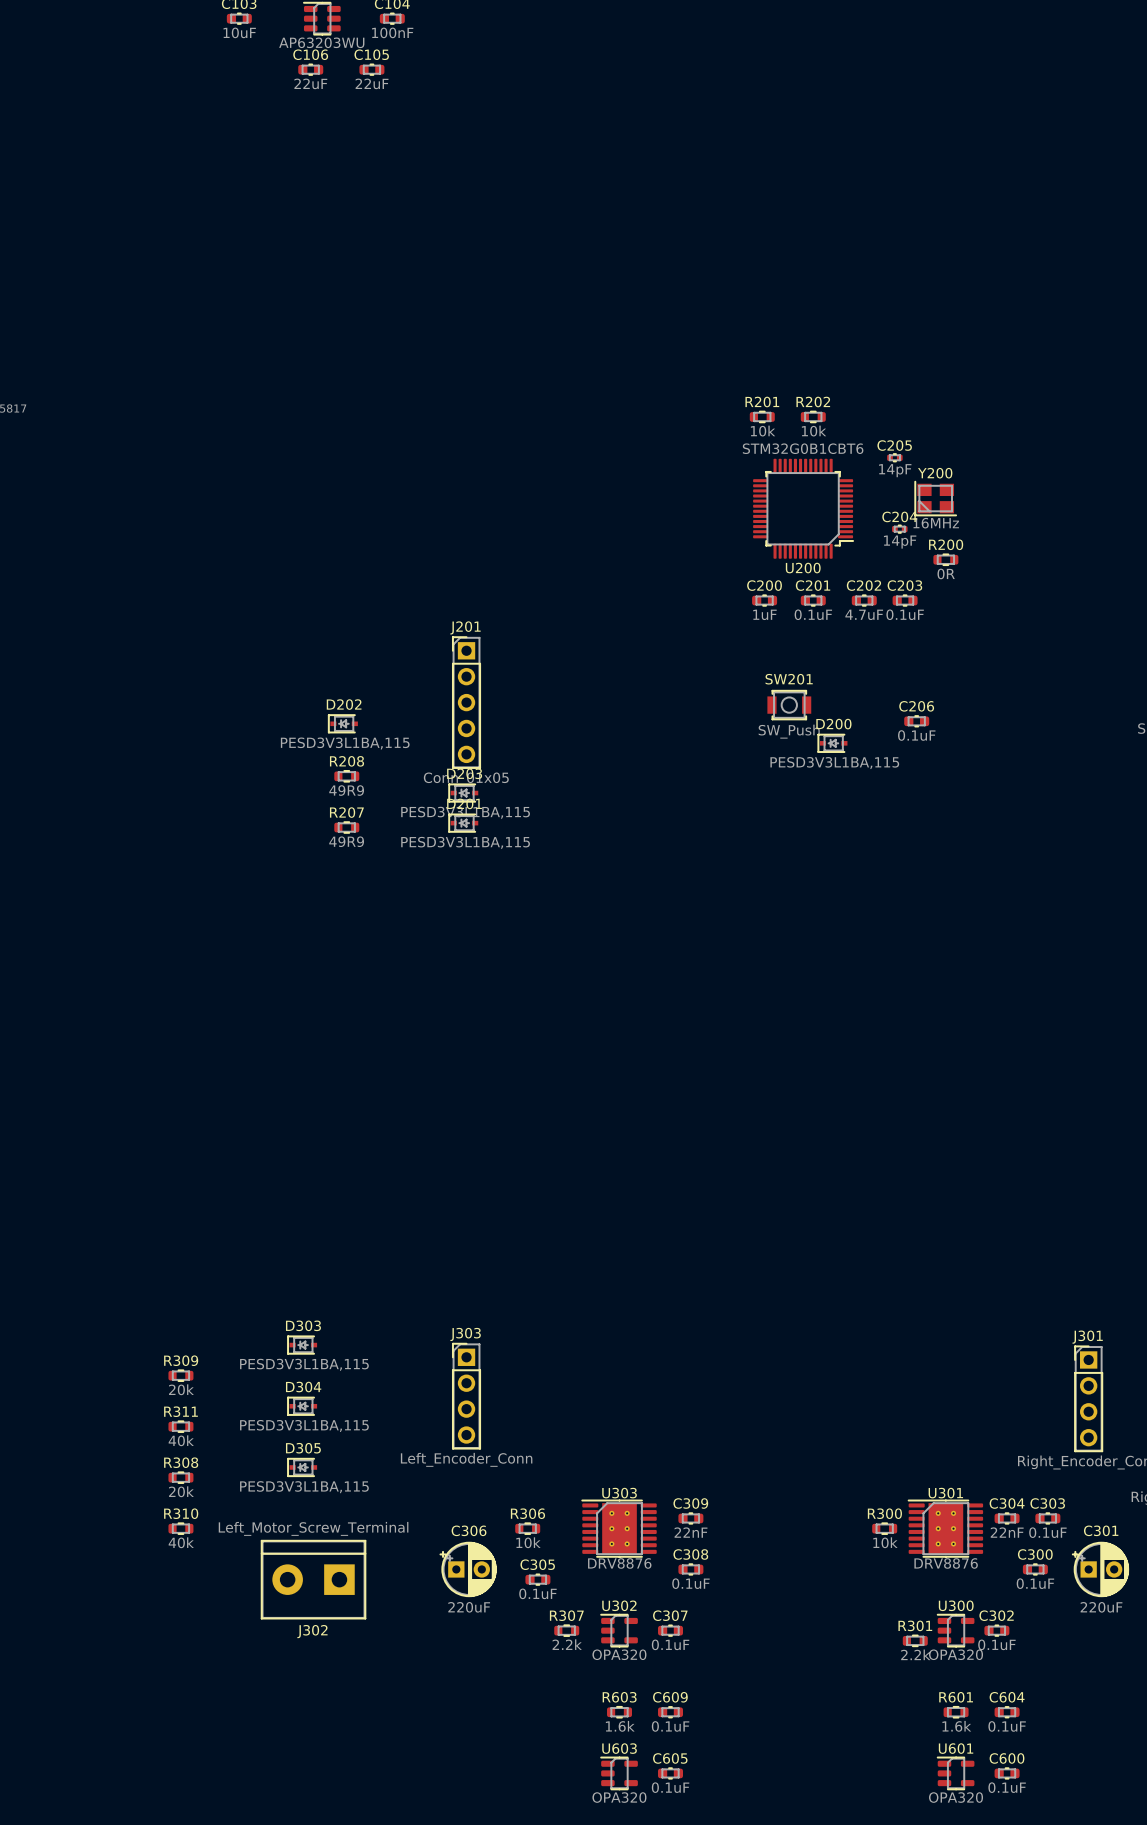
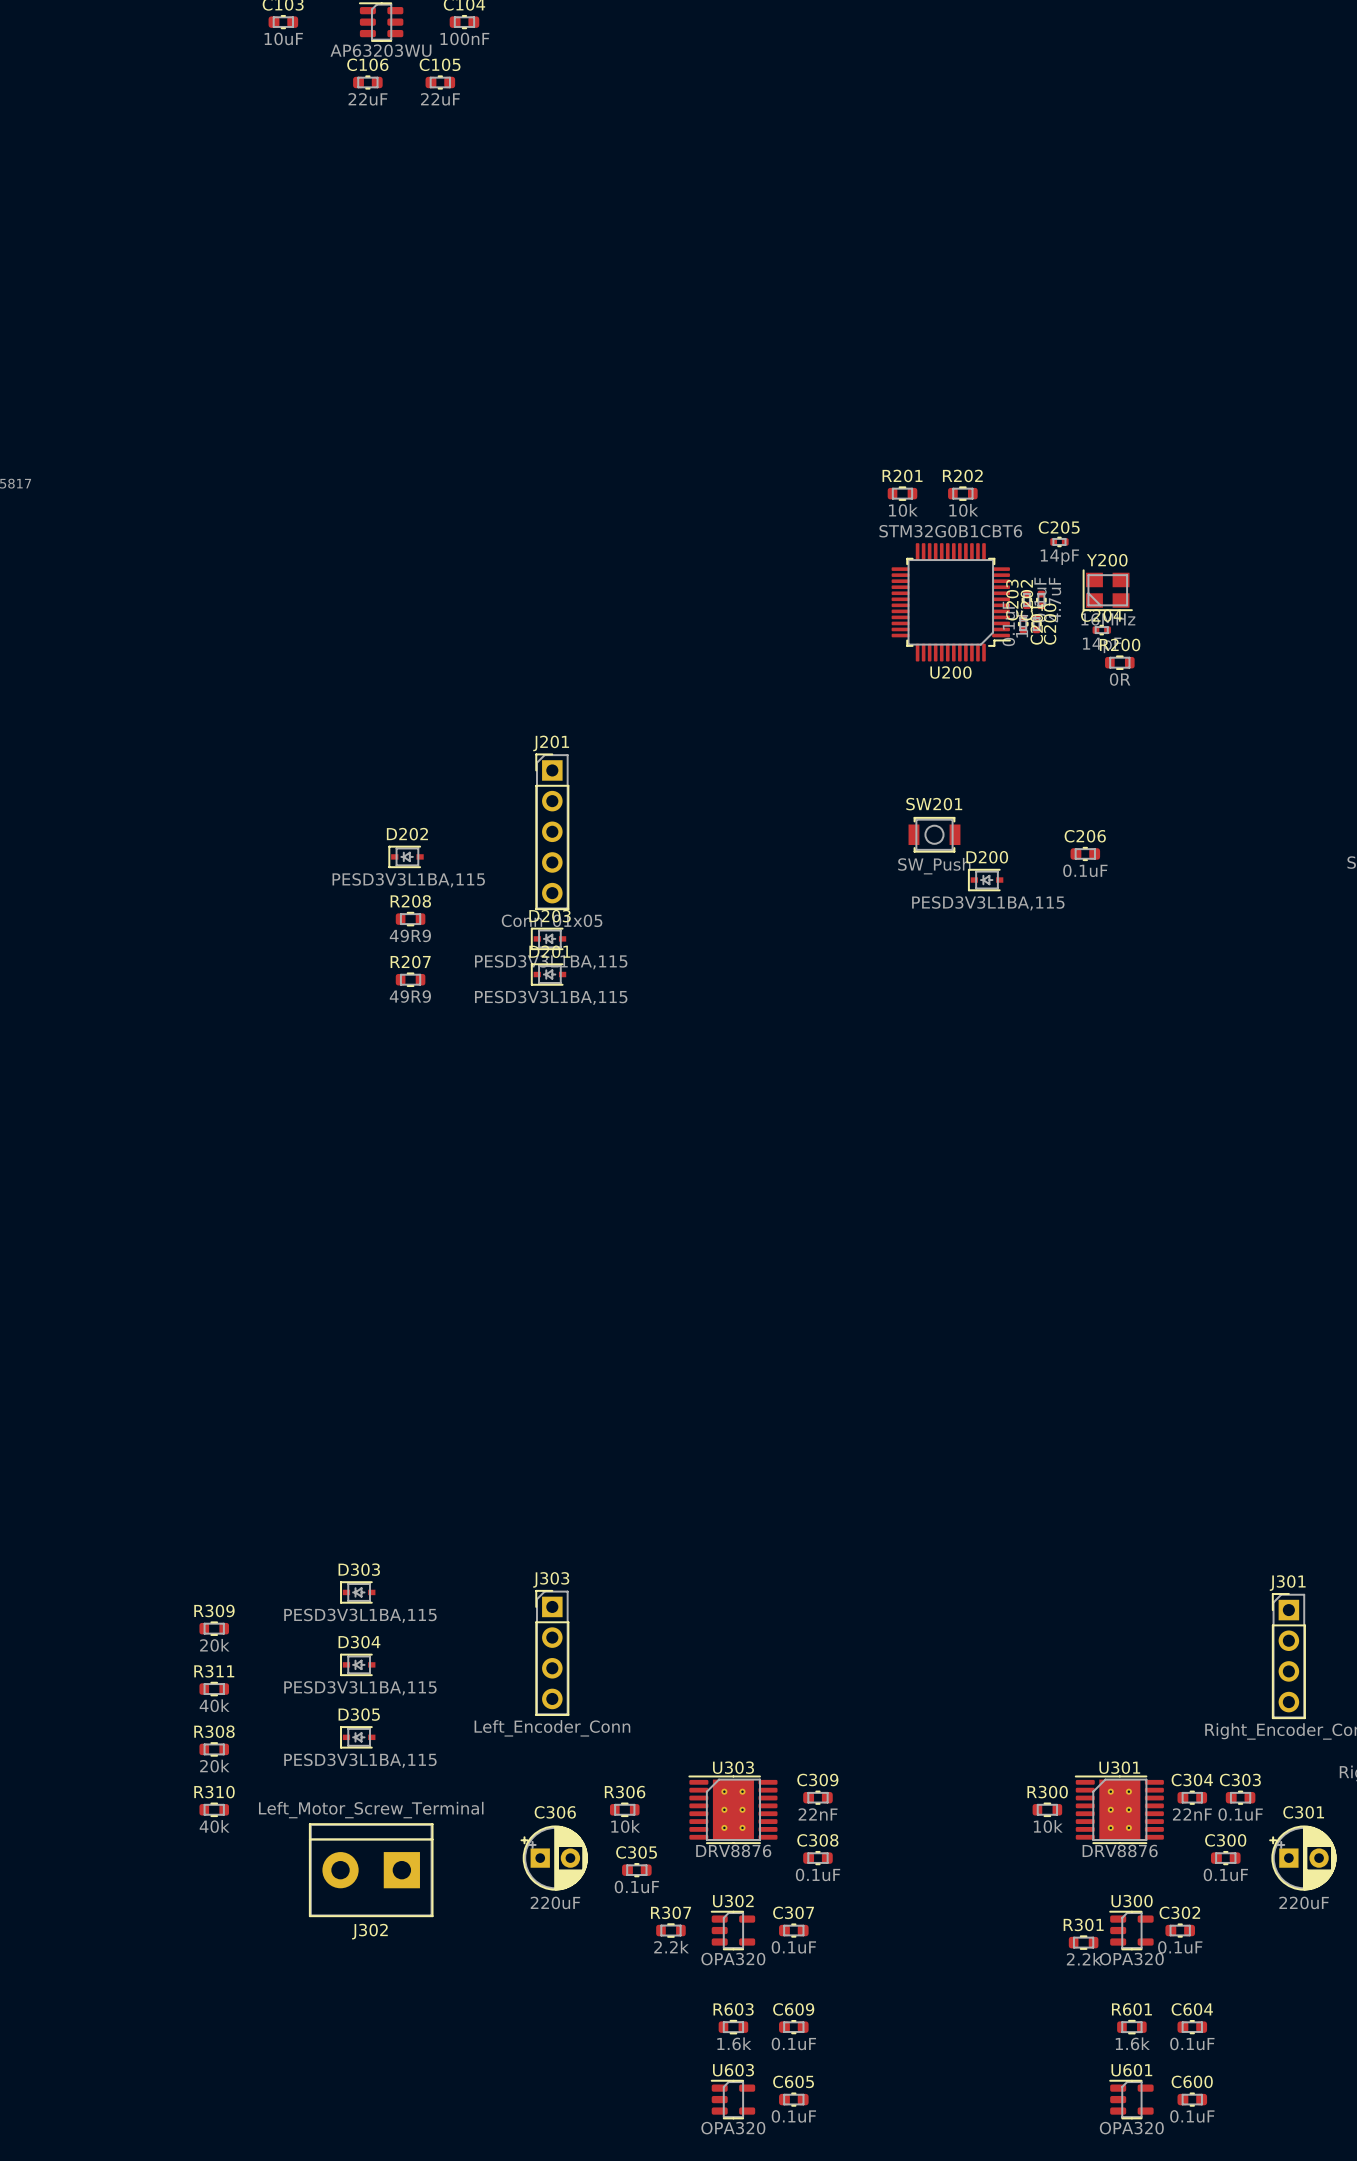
C204 position: (899, 529) -> (1101, 630)
C200 footprint: [752, 594, 778, 607] -> [1031, 614, 1042, 634]
C201 footprint: [800, 594, 826, 607] -> [1018, 614, 1029, 634]
C202 footprint: [851, 594, 877, 607] -> [1036, 590, 1047, 610]
C203 footprint: [892, 594, 918, 607] -> [1021, 590, 1032, 610]

